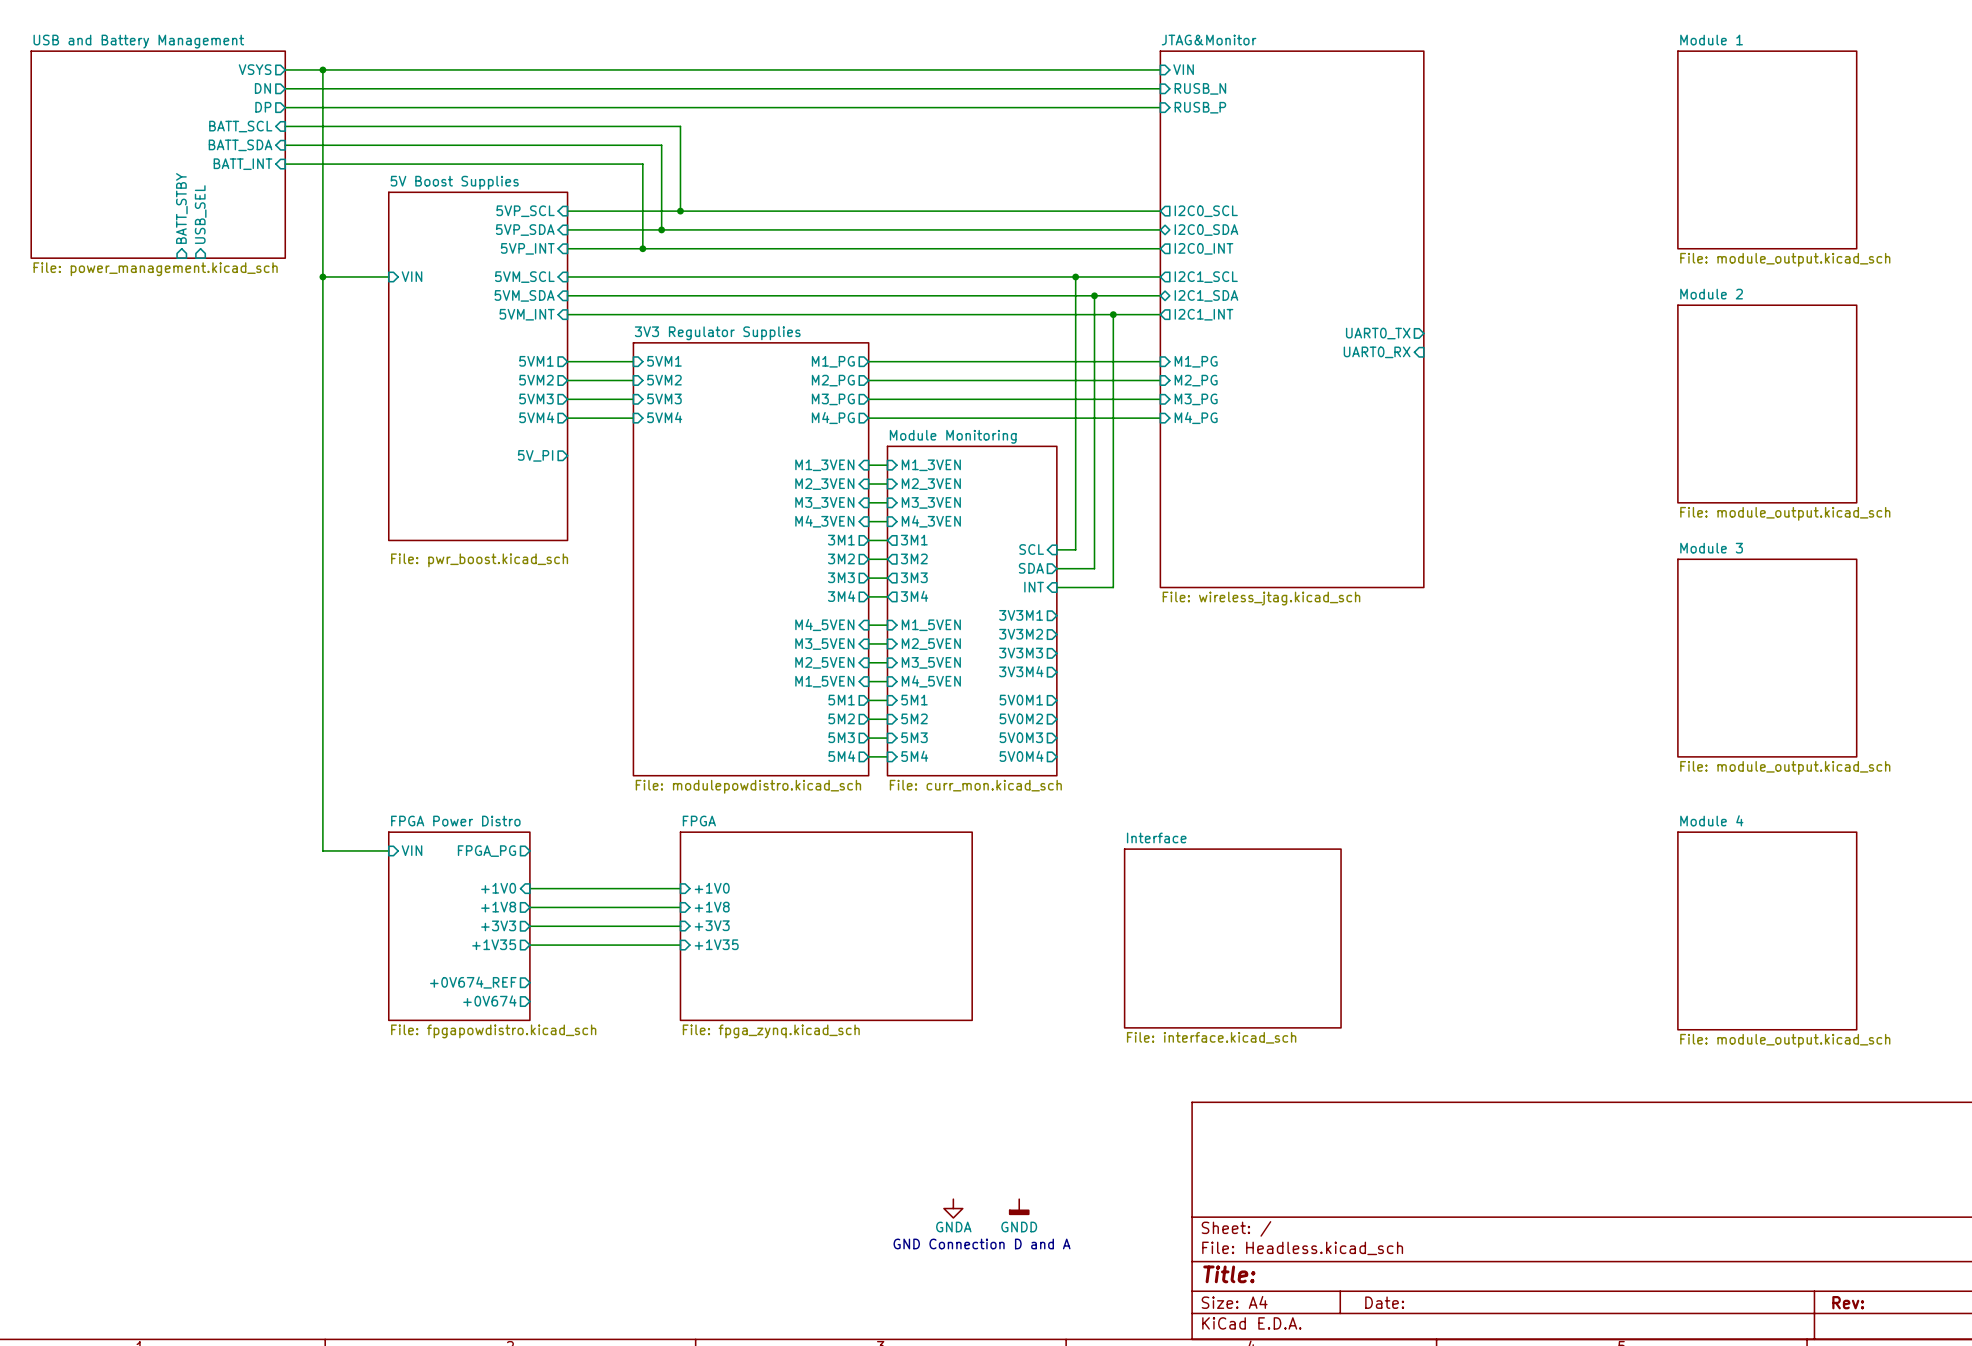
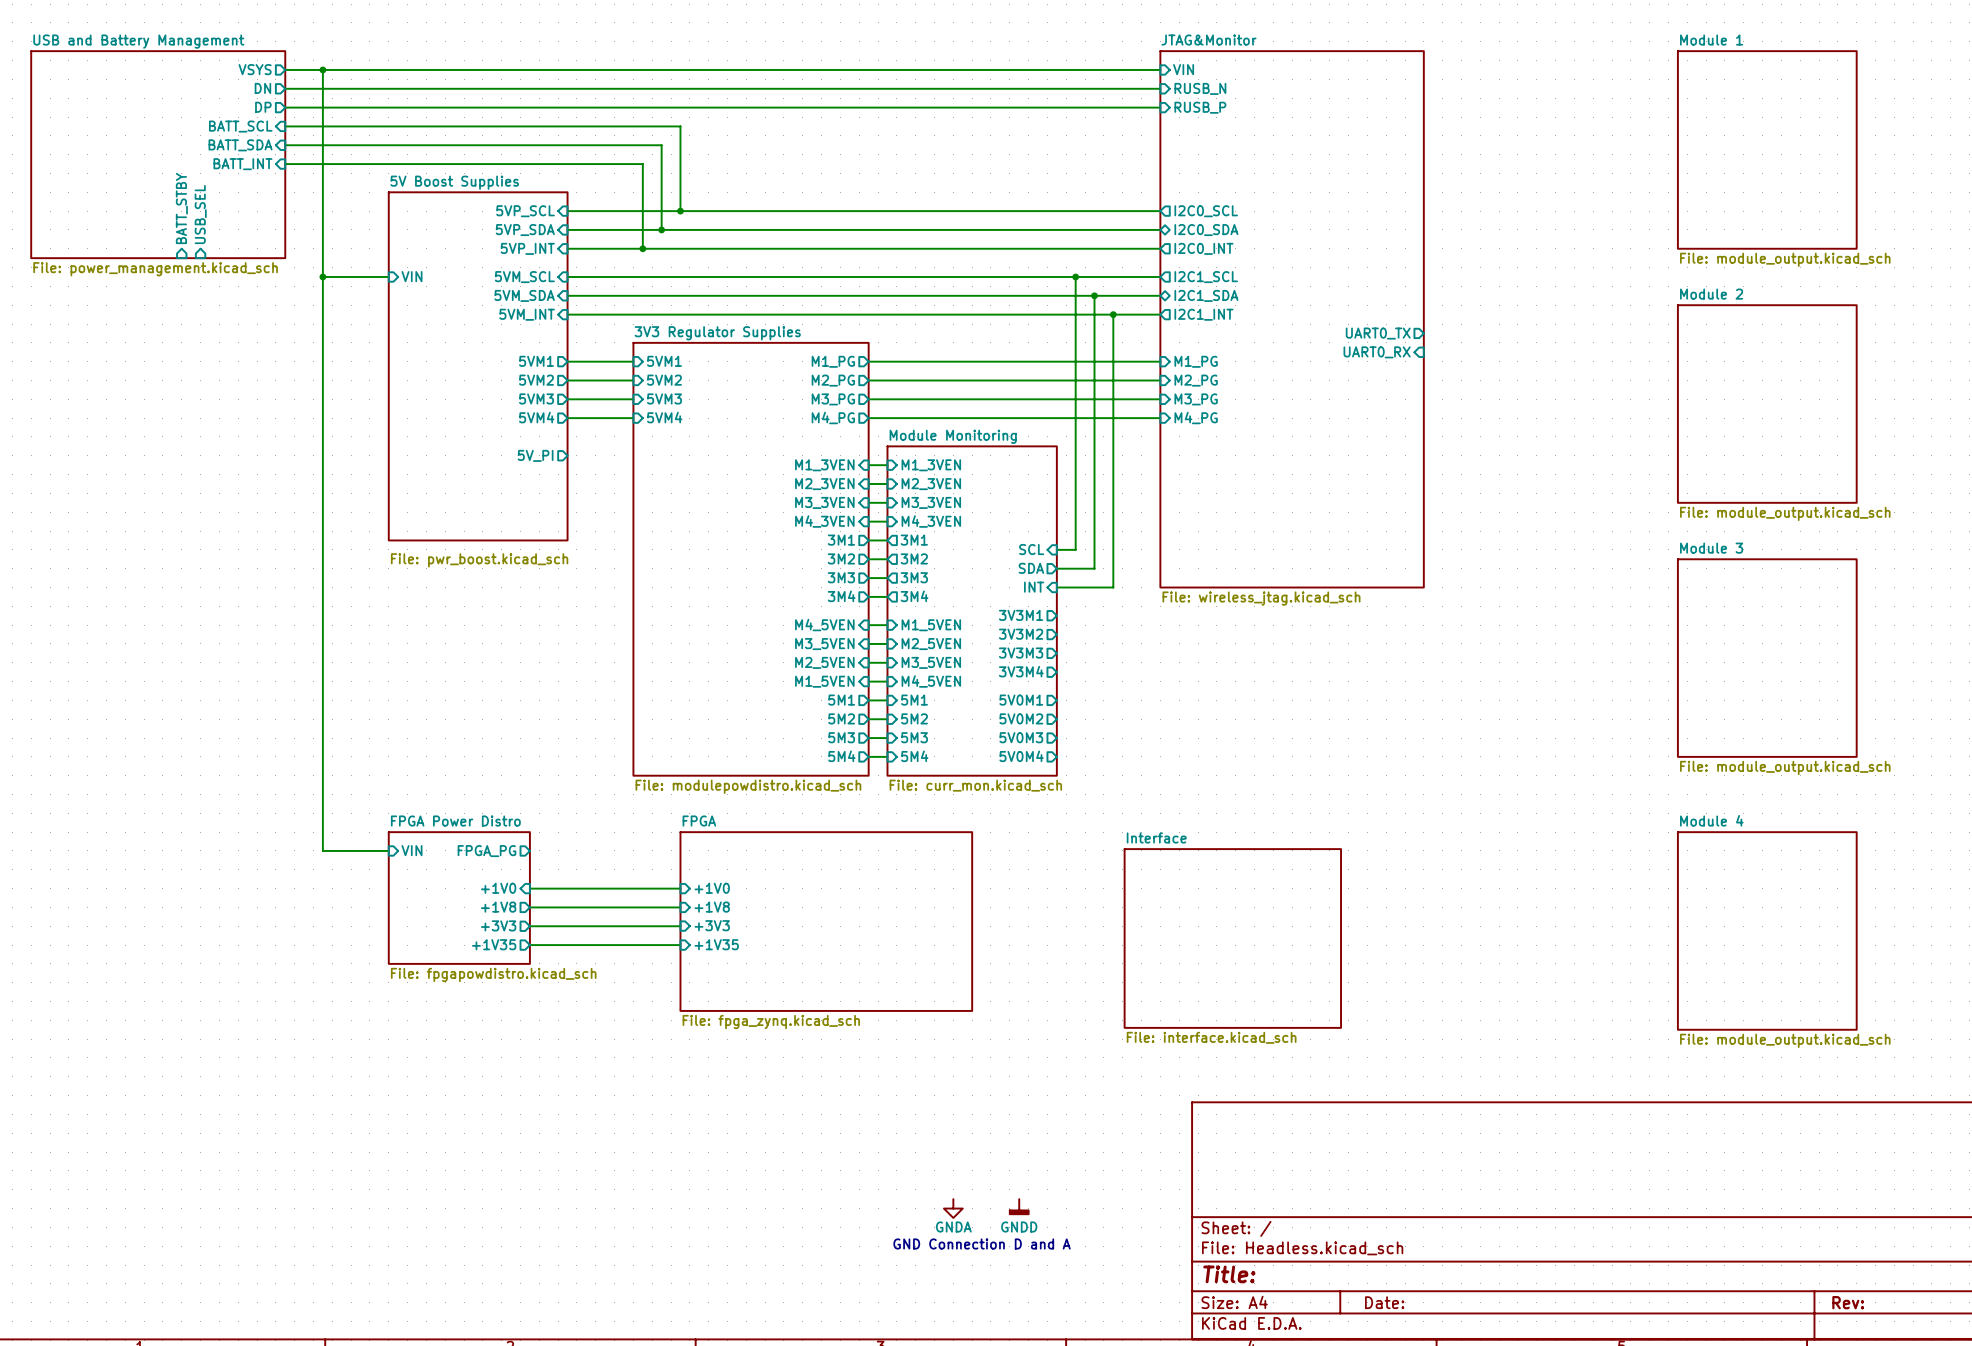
sheet FPGA shape: [679, 831, 973, 1021] -> [679, 831, 973, 1012]
sheet FPGA Power Distro: none -> File: fpgapowdistro.kicad_sch (459, 898)
sheet FPGA Power Distro: File: fpgapowdistro.kicad_sch (459, 926) -> none
sheet pin: +0V674_REF (473, 982) -> none
sheet pin: +0V674 (489, 1000) -> none

